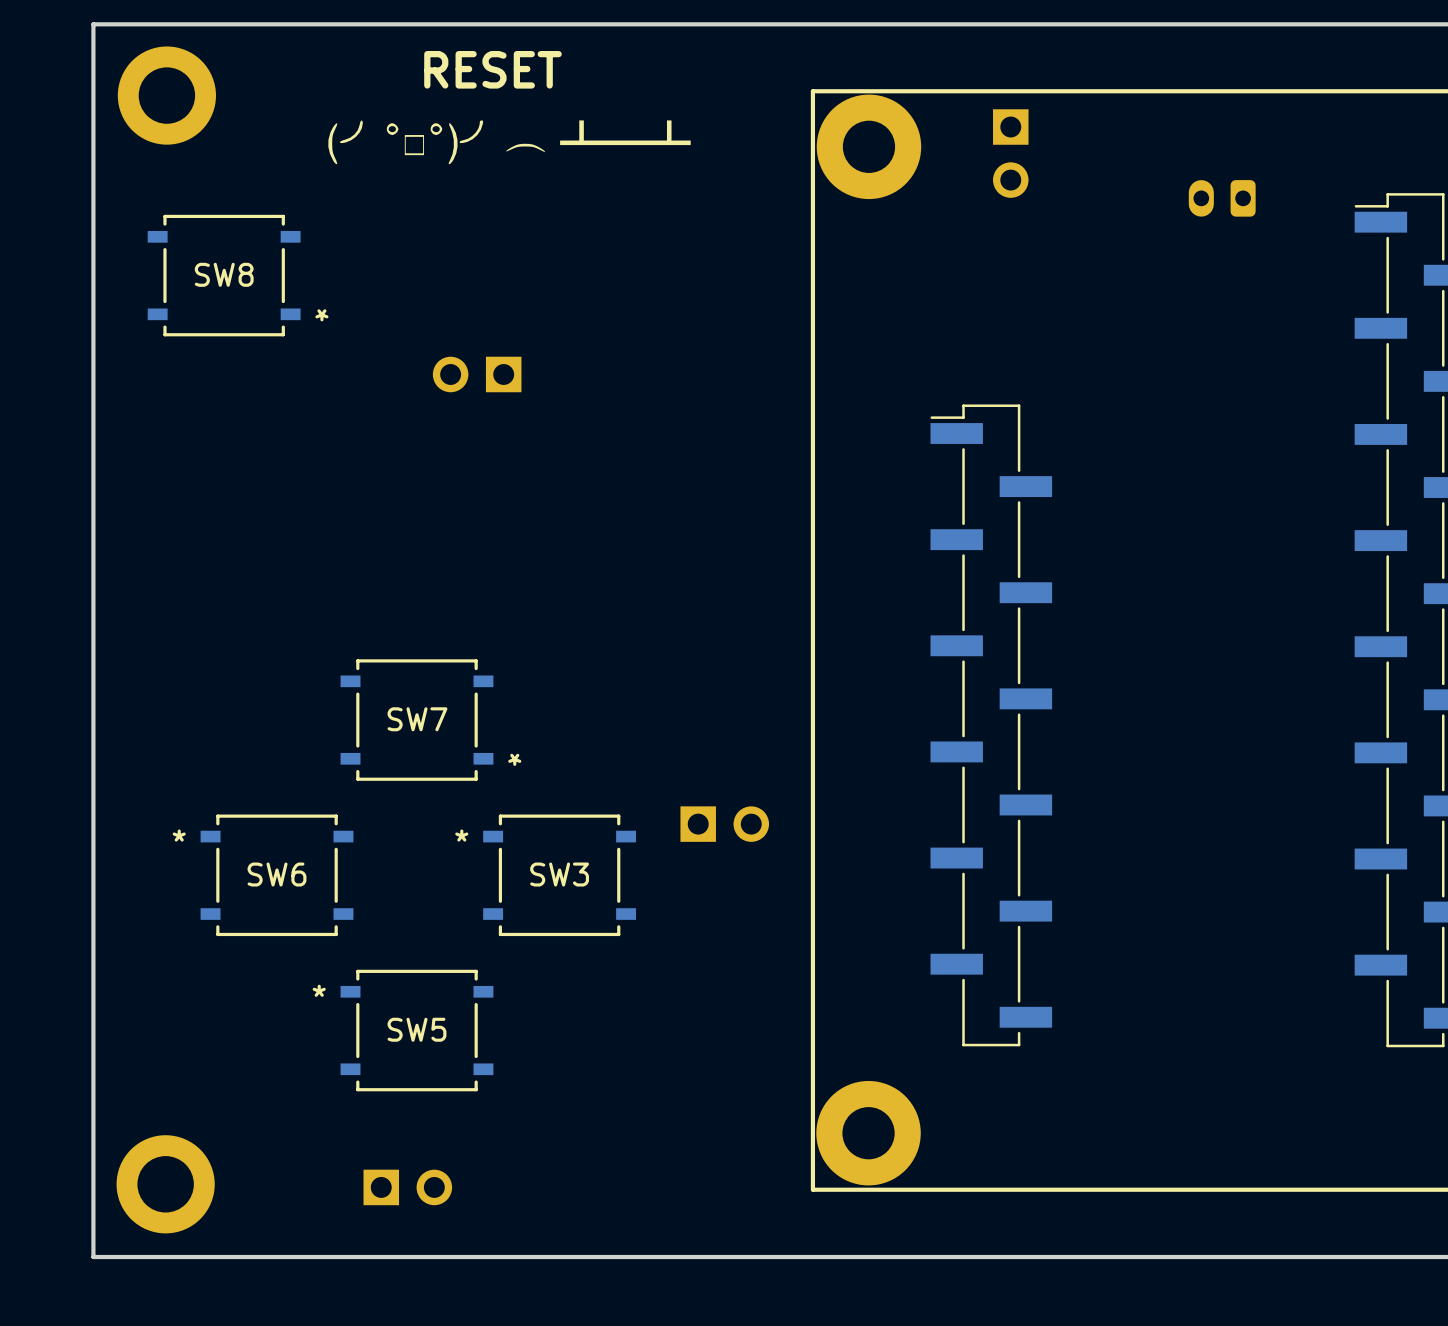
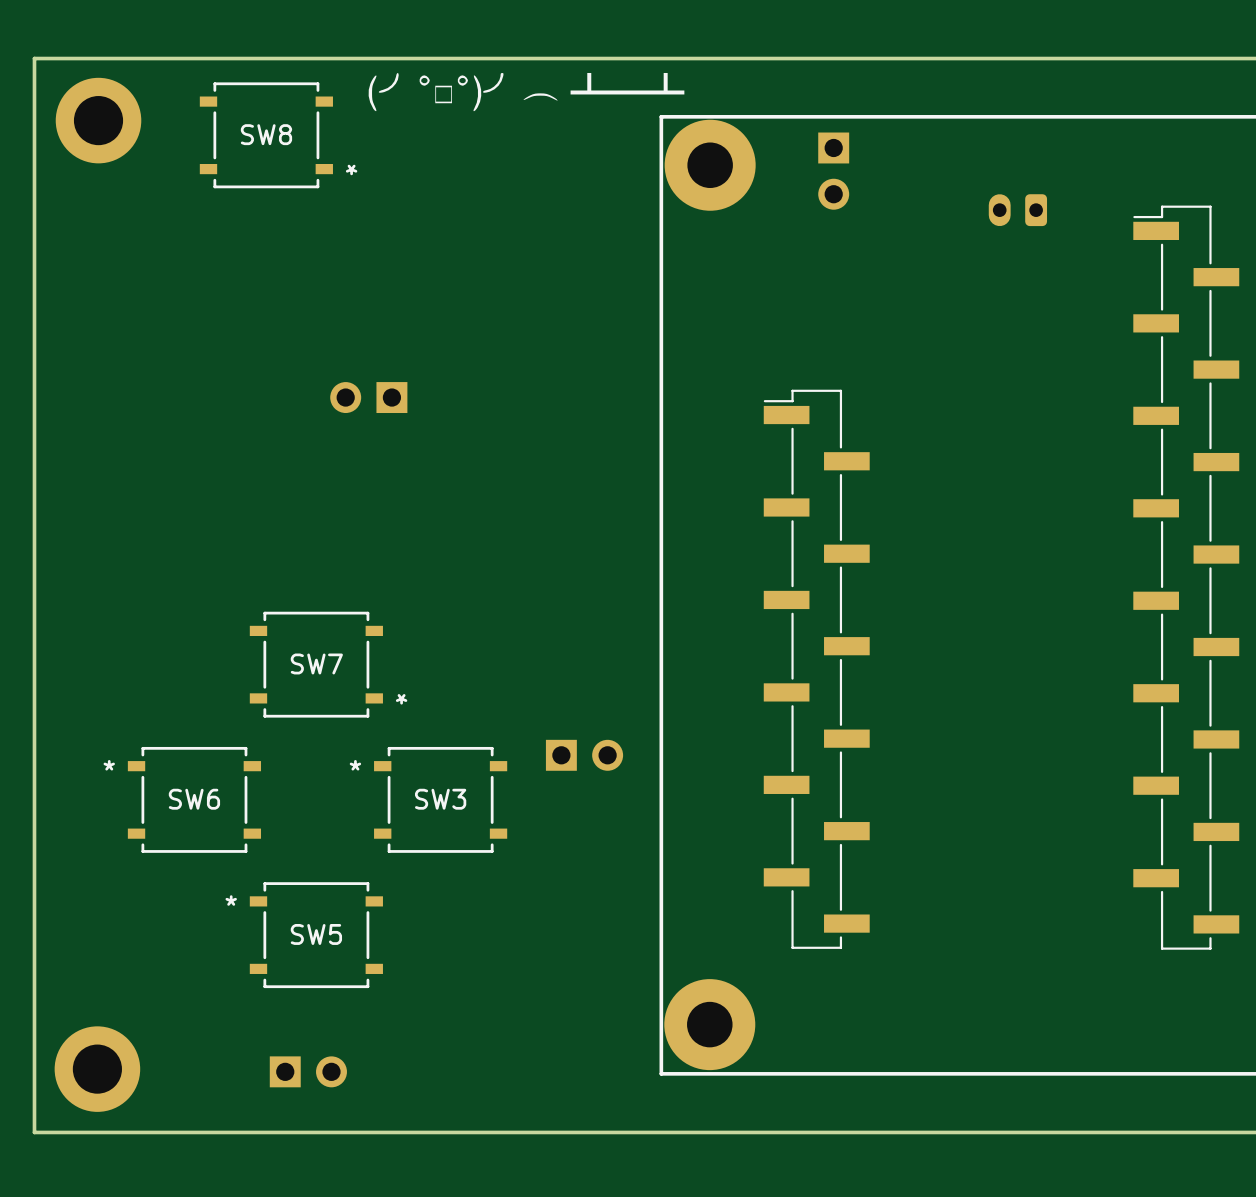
text: RESET (492, 69) -> none
drawing position: (509, 142) -> (526, 92)
SW8 position: (224, 275) -> (266, 135)
part position: (477, 374) -> (368, 397)

